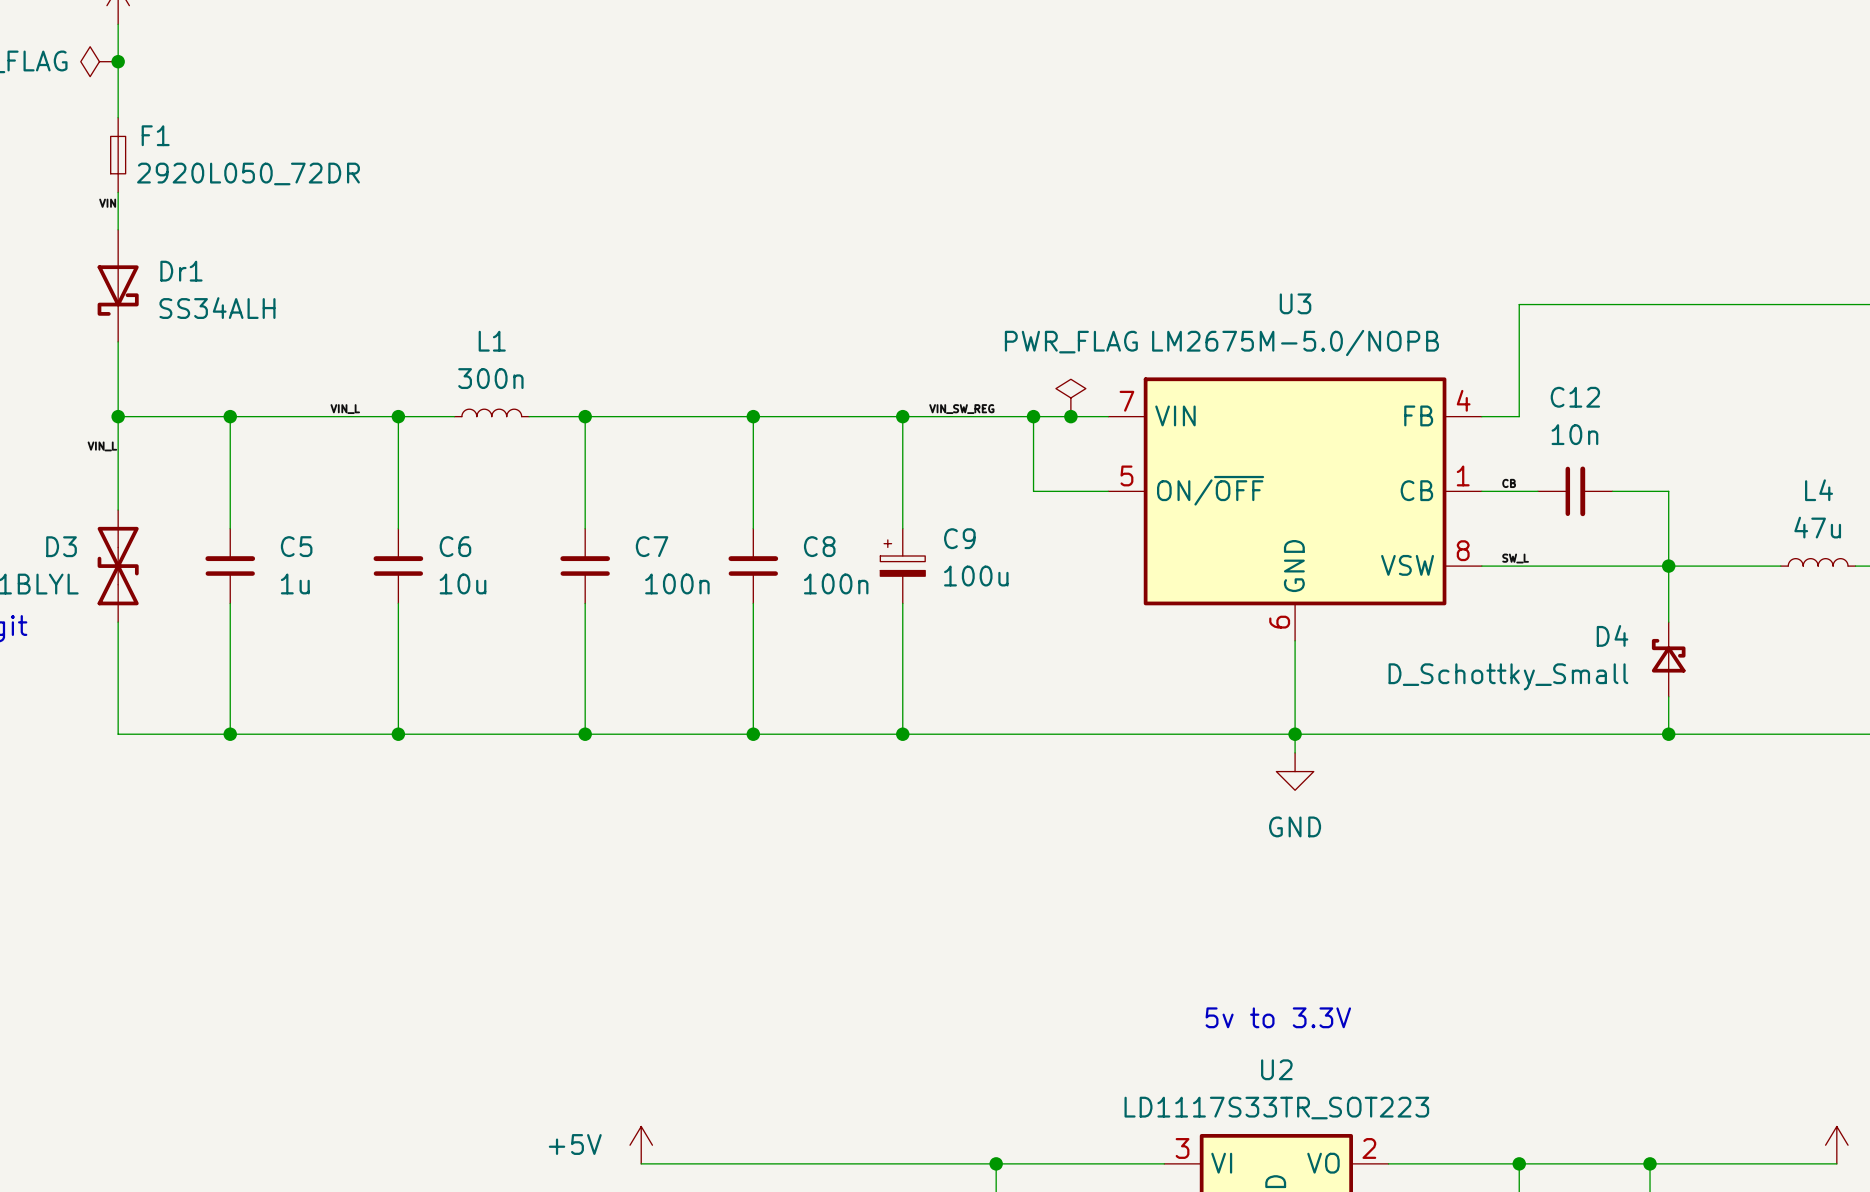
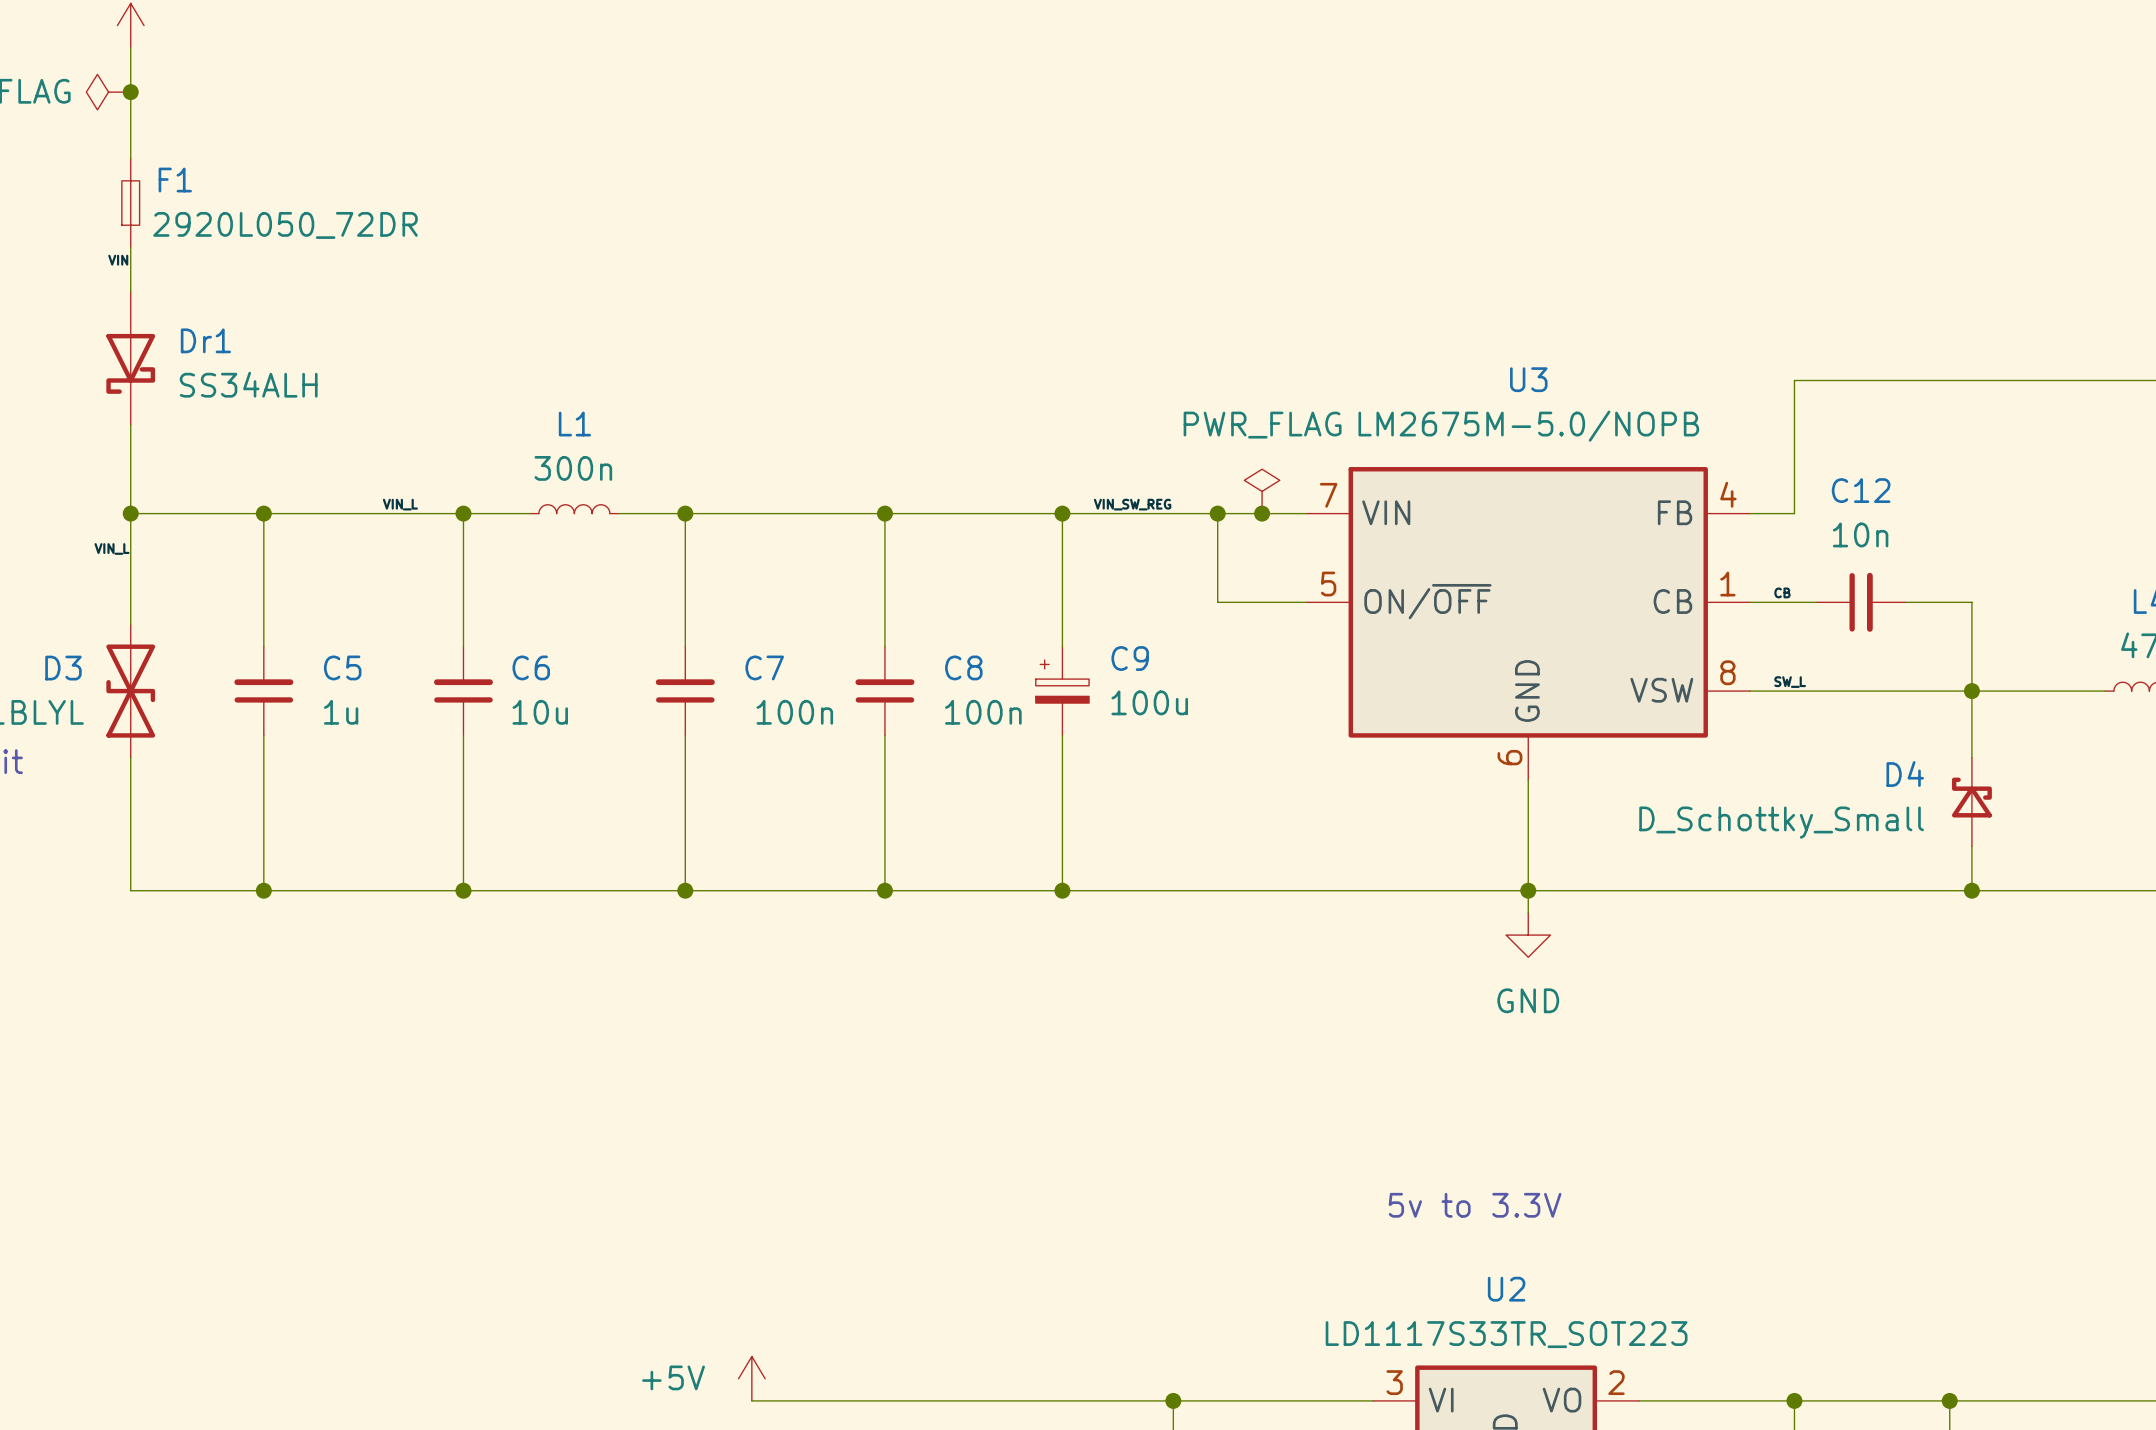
text position: 5v to 3.3V (1278, 1017) -> 5v to 3.3V (1475, 1205)

